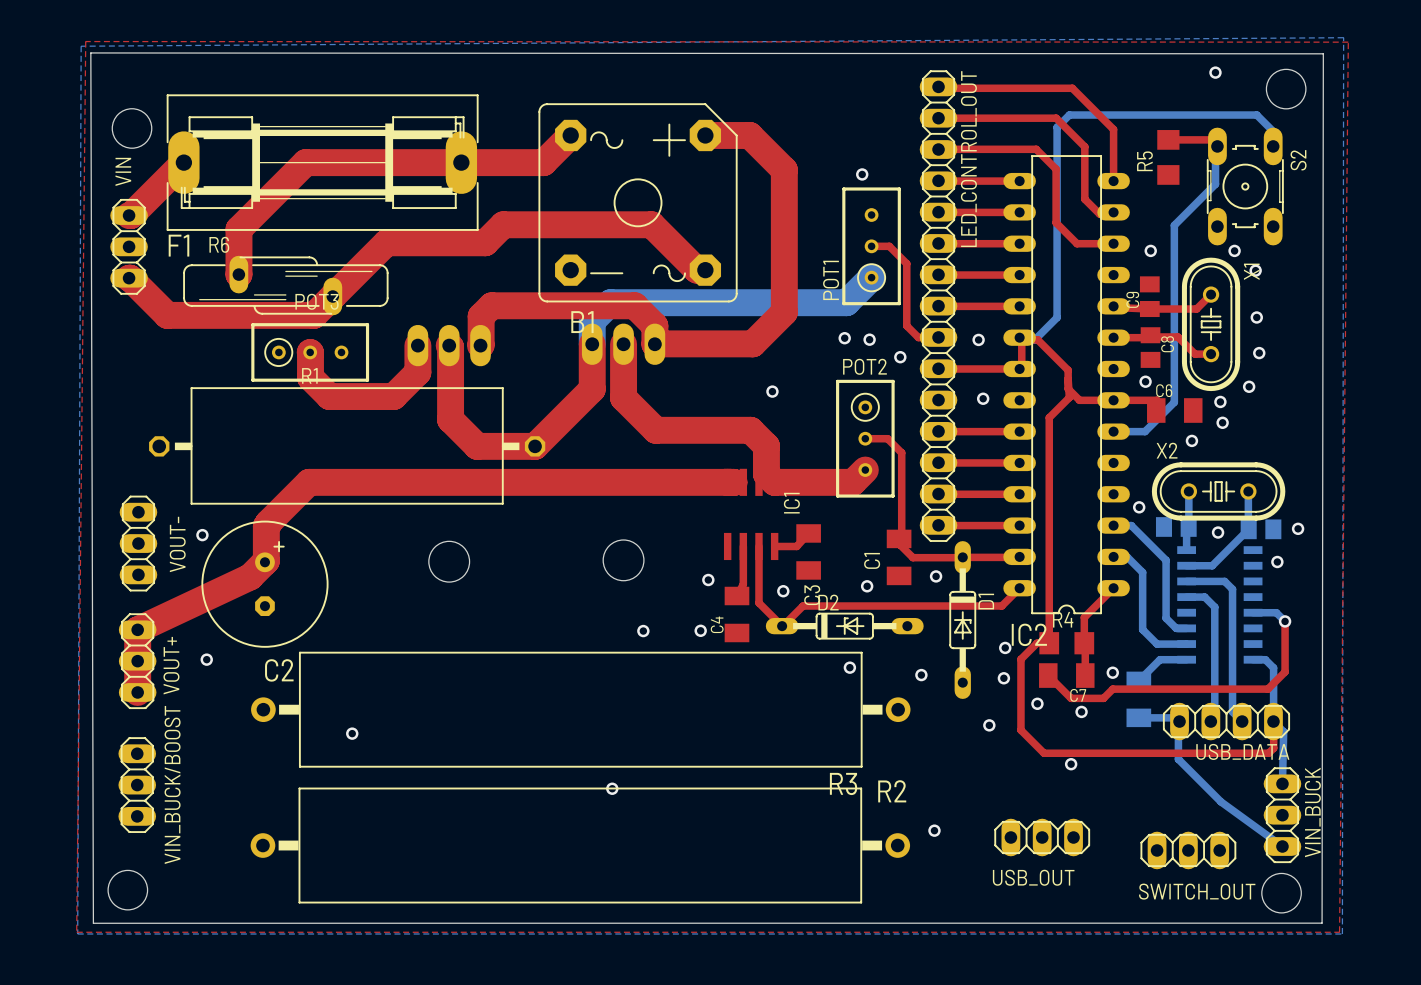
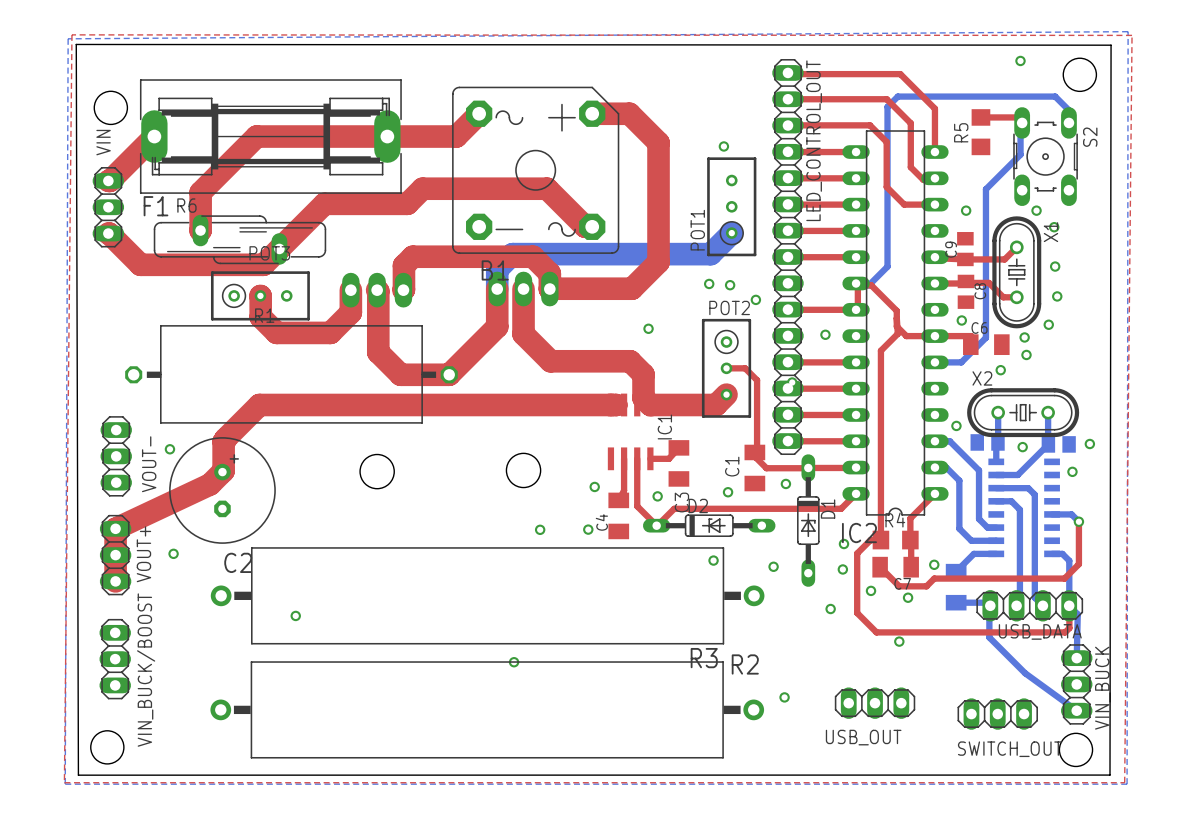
top track: (871, 246) (889, 246) (906, 263) (906, 325) (918, 337) (938, 337) -> none
via: (978, 339) -> none
via: none -> (792, 382)

